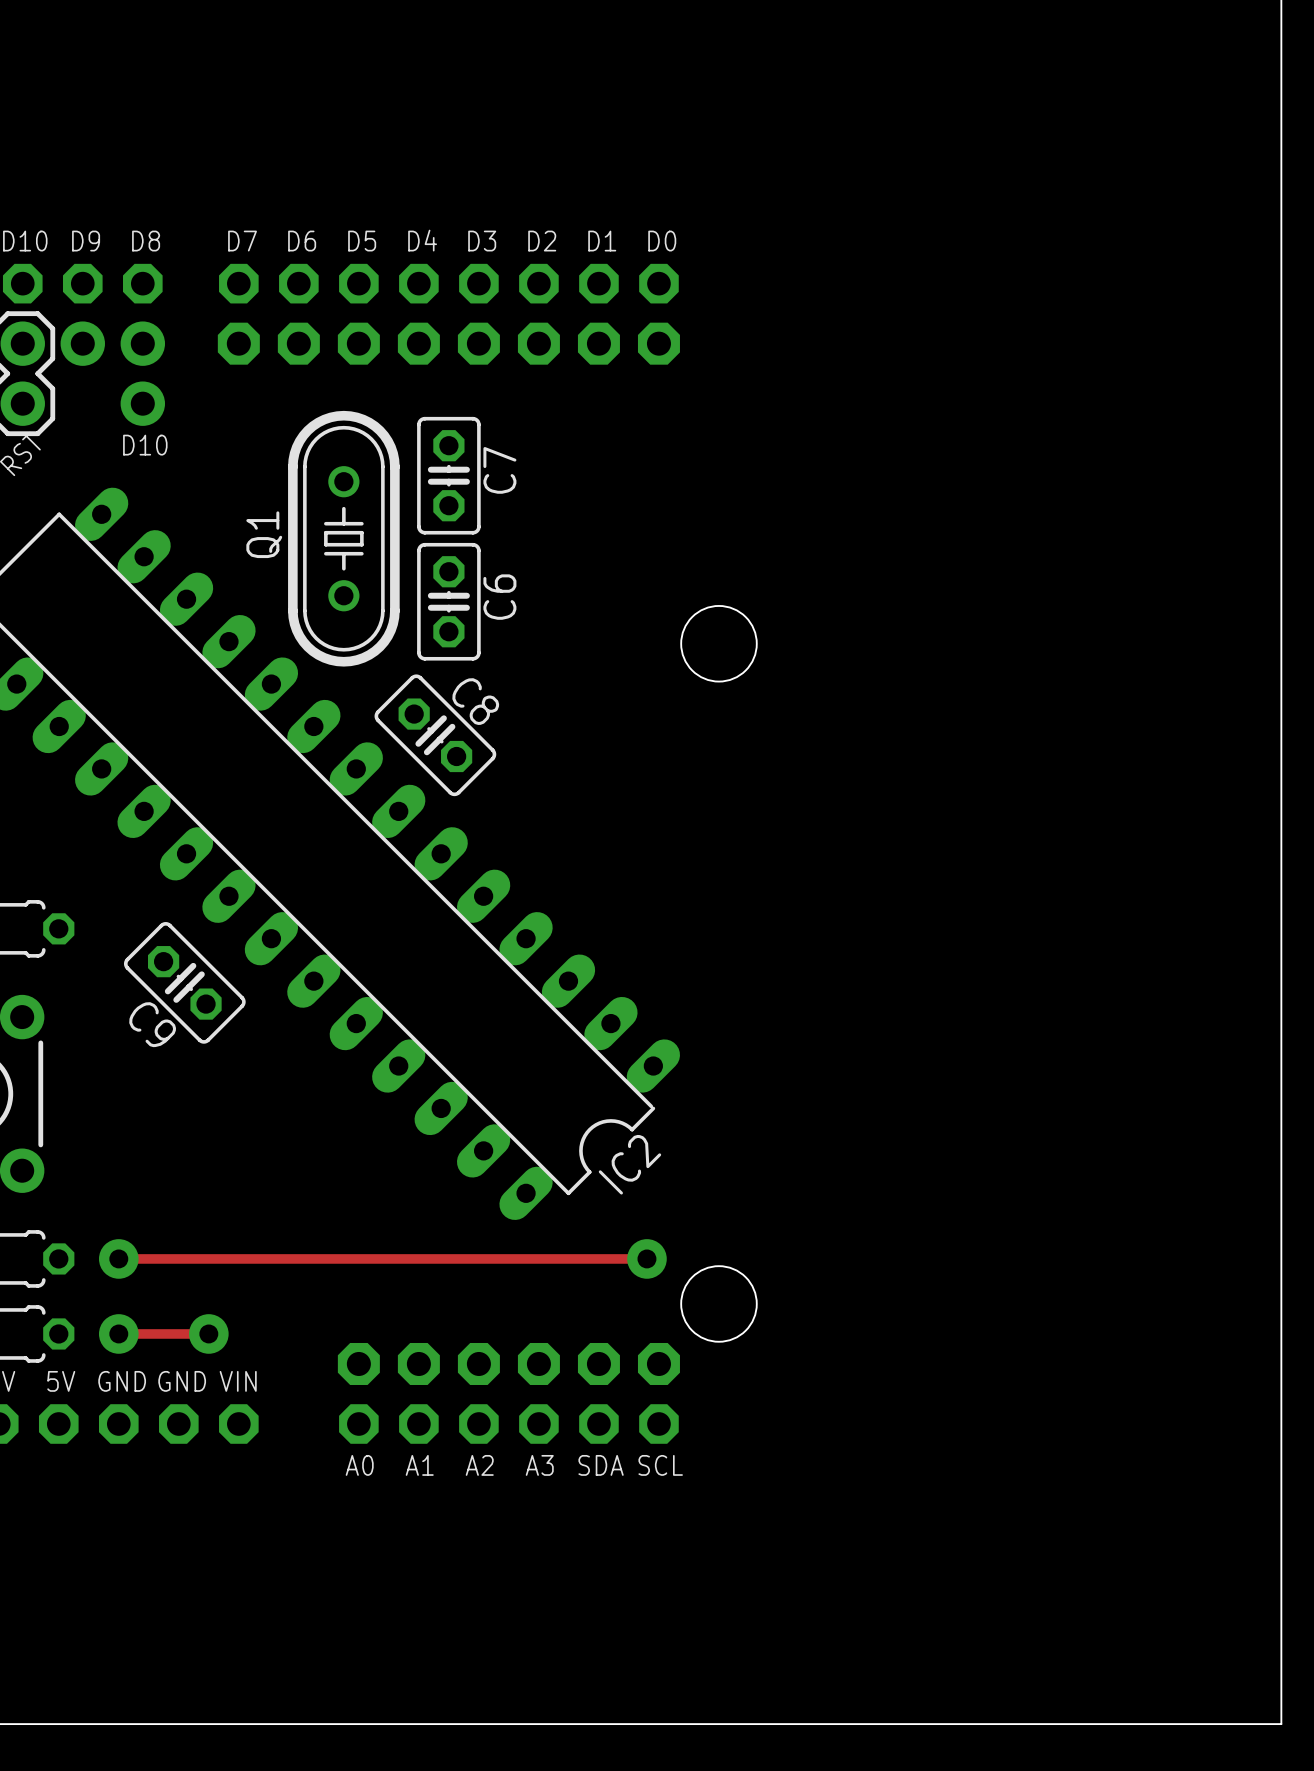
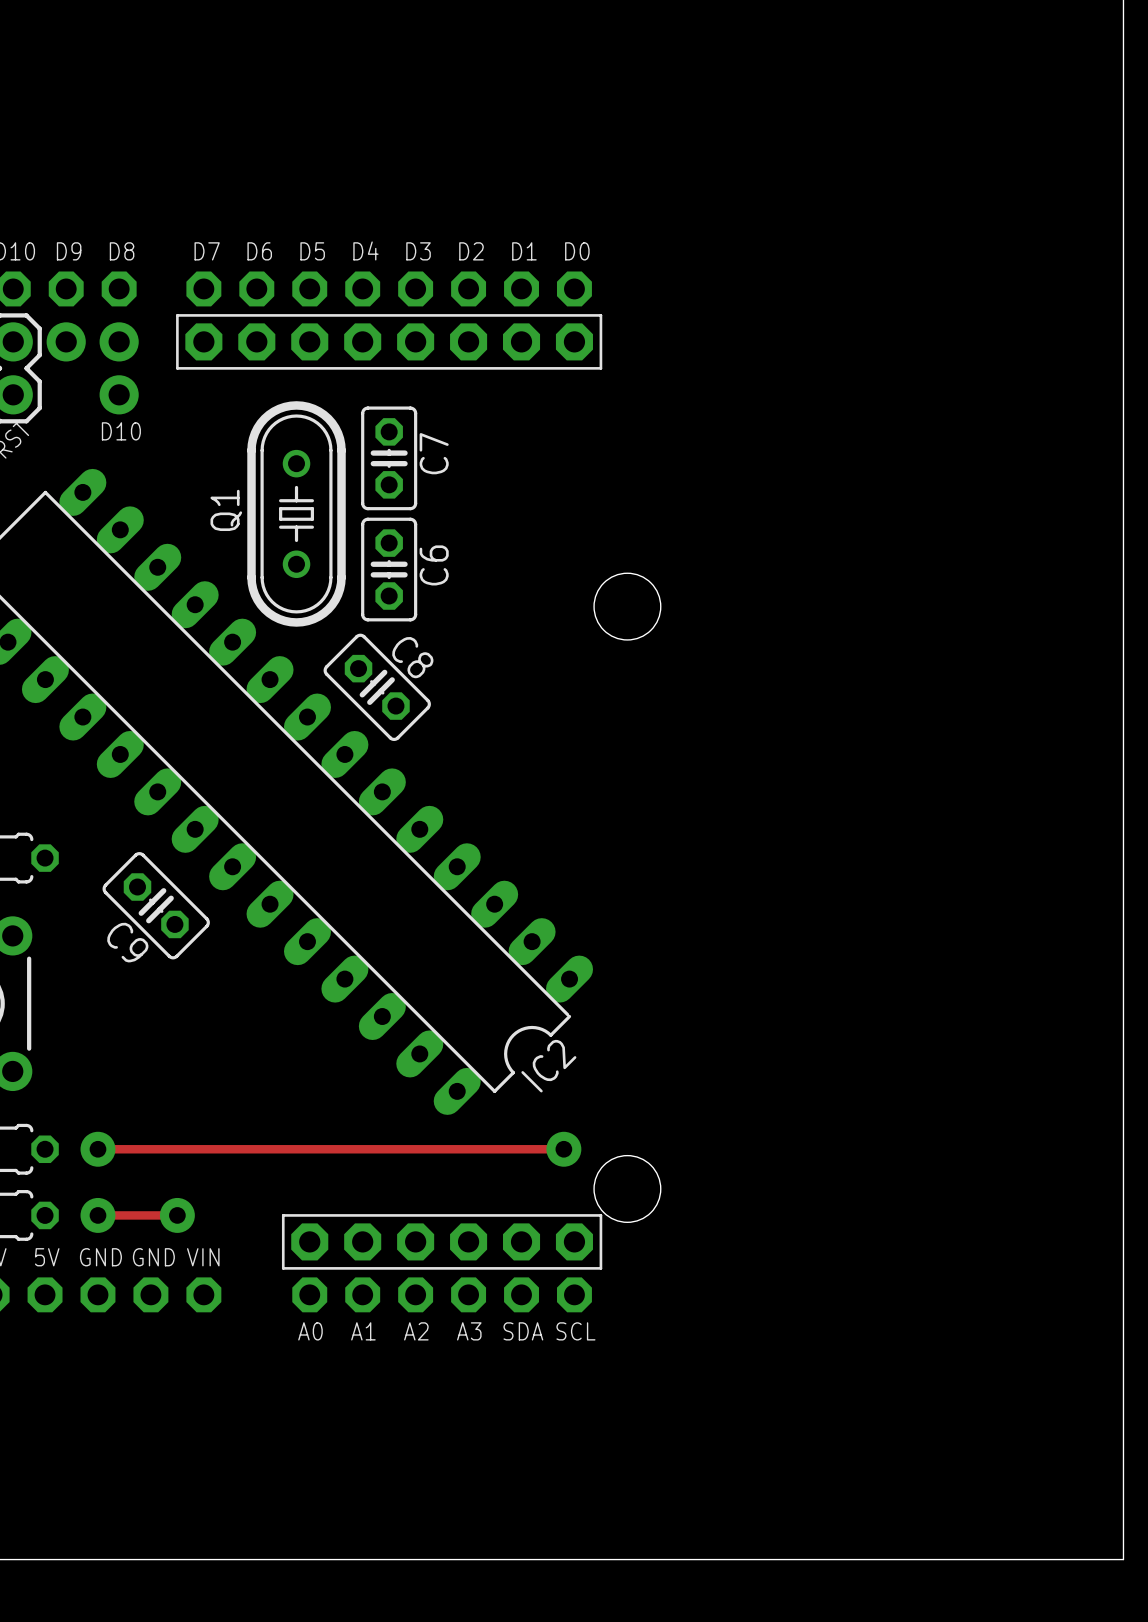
part footprint: [217, 322, 680, 365] -> [176, 314, 603, 370]
part footprint: [337, 1342, 680, 1385] -> [281, 1214, 603, 1270]

